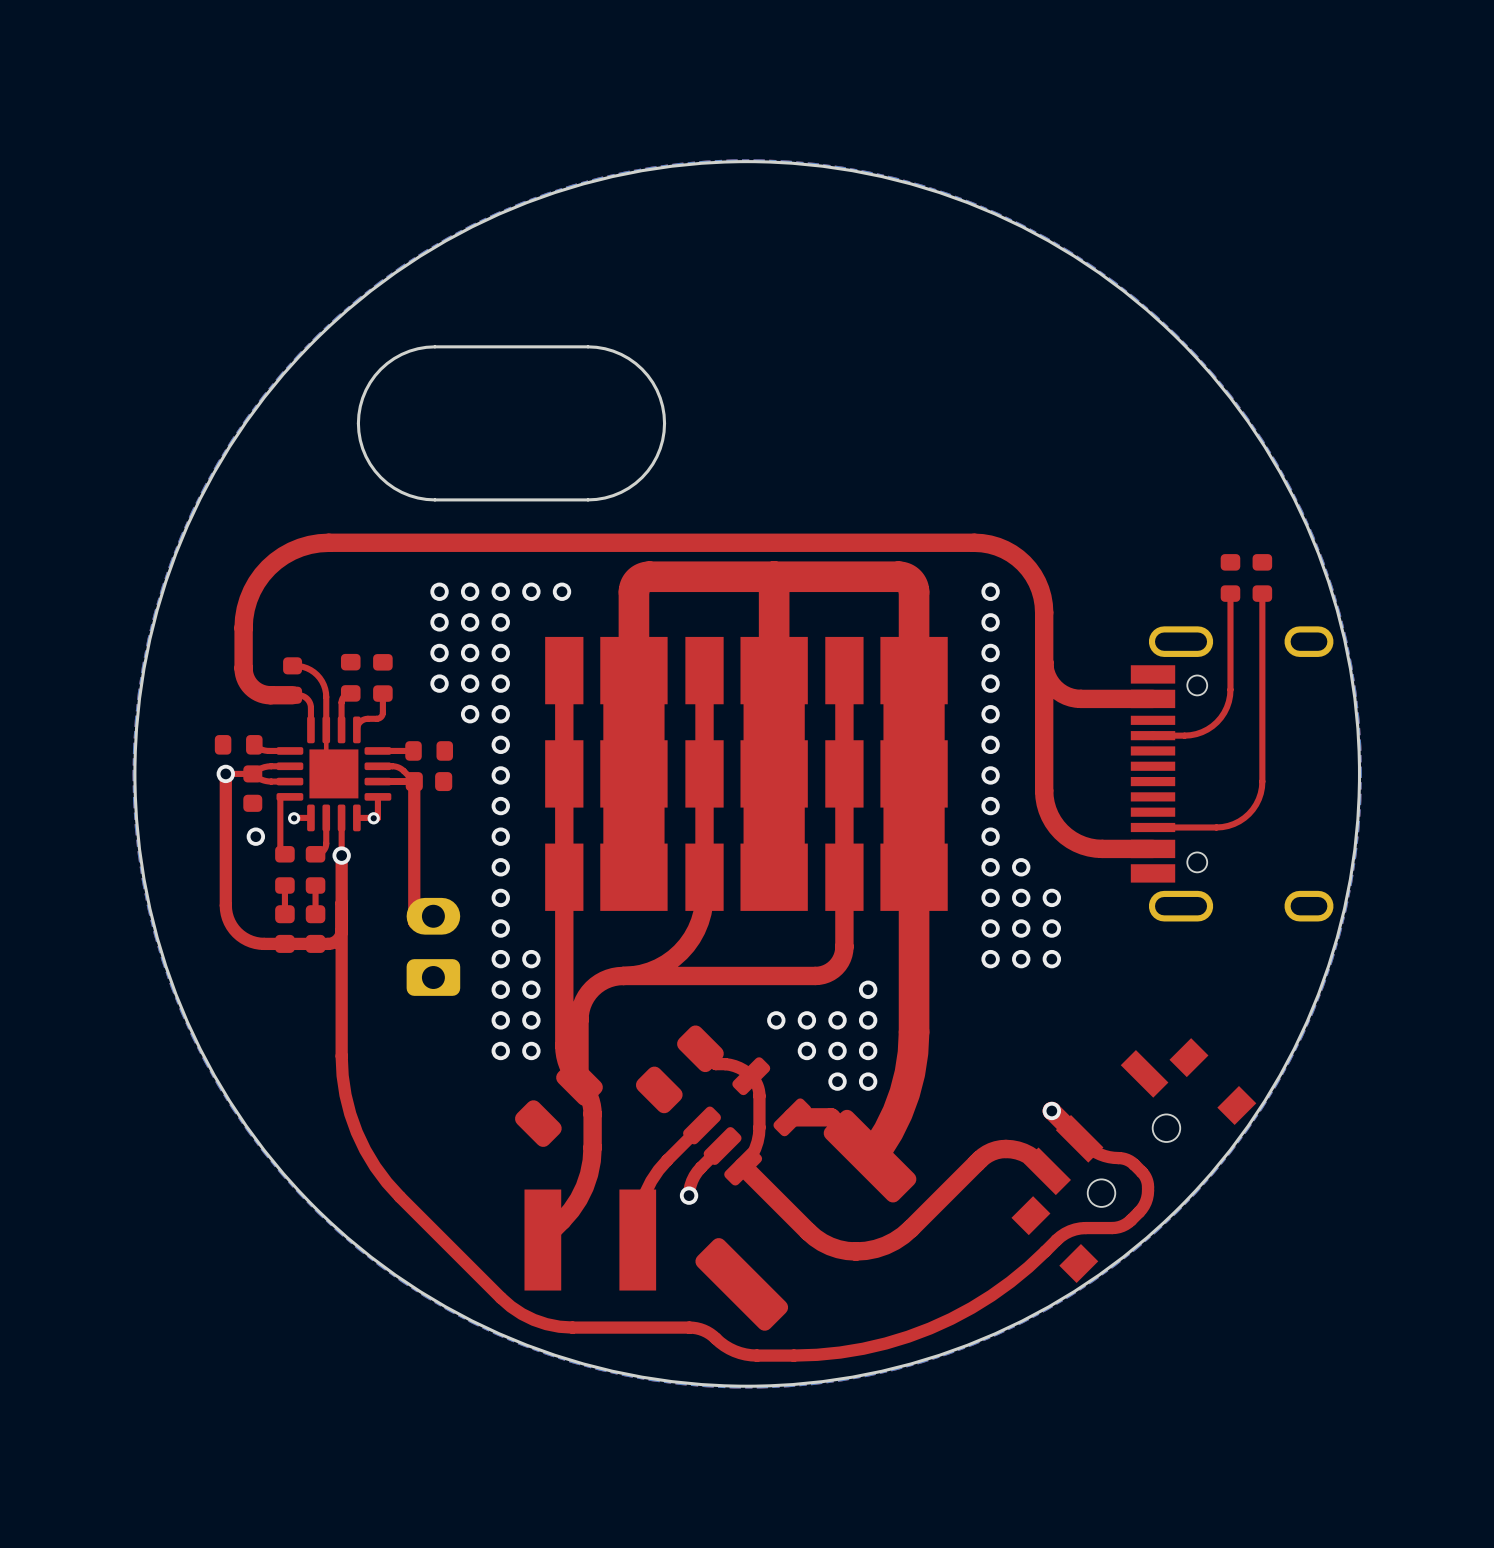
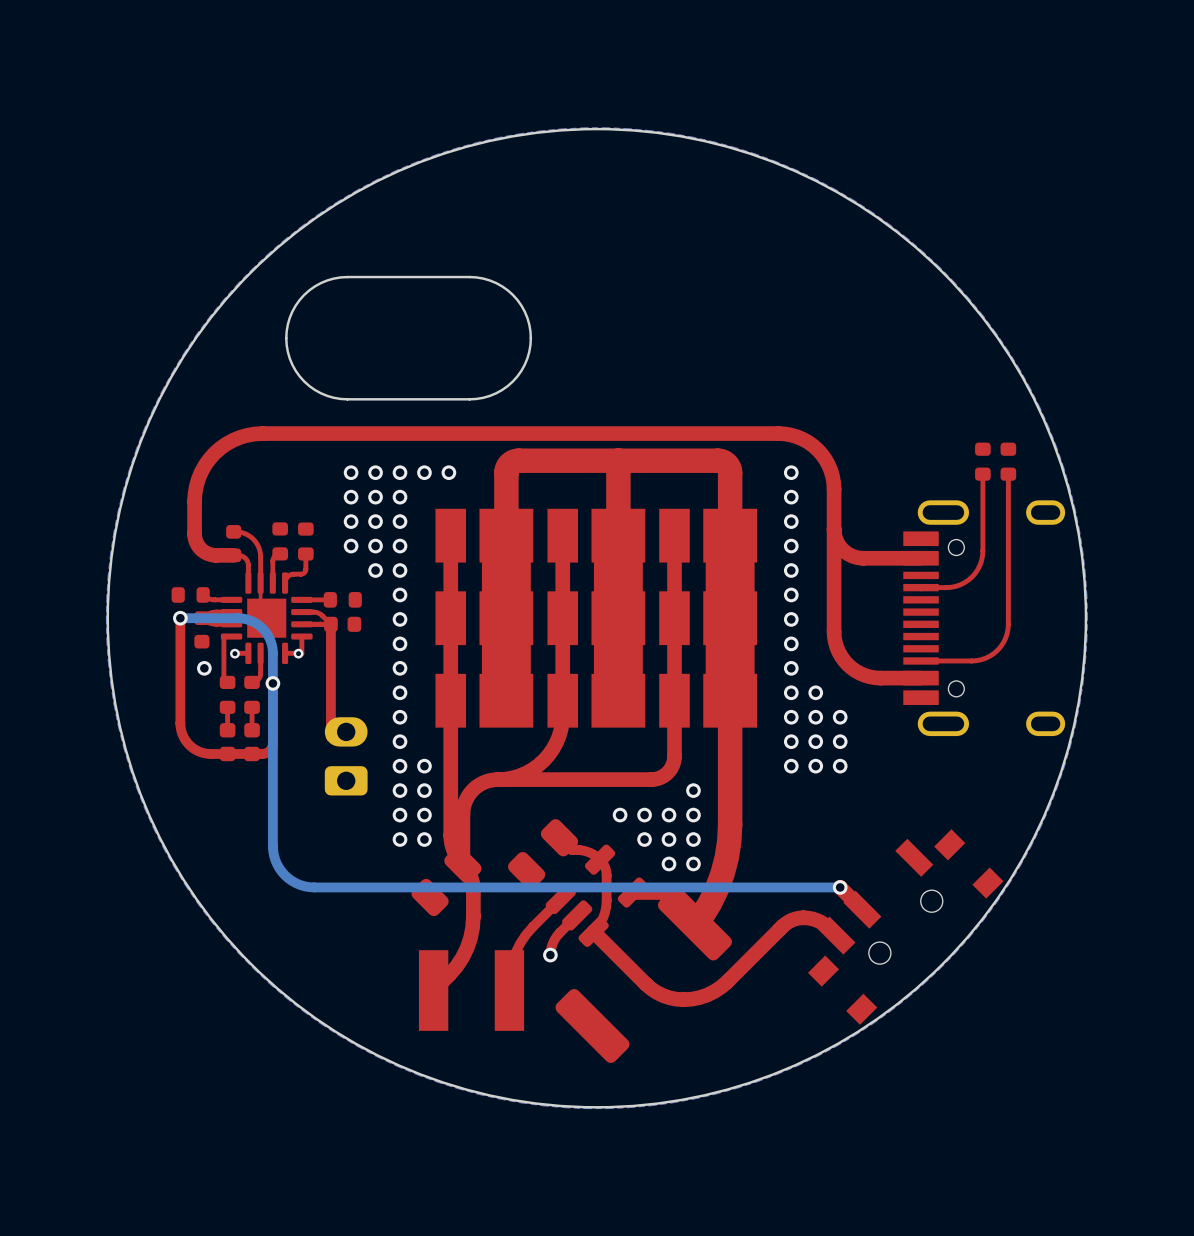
bottom track: none -> (180, 618) (246, 619) (259, 625) (270, 639) (272, 653) (273, 850) (275, 859) (281, 871) (292, 881) (300, 885) (314, 887) (840, 887)
top track: (341, 930) (342, 1075) (350, 1113) (365, 1150) (375, 1166) (399, 1196) (500, 1297) (521, 1314) (546, 1324) (572, 1327) (696, 1328) (710, 1333) (734, 1351) (756, 1355) (840, 1352) (863, 1348) (908, 1336) (951, 1318) (991, 1295) (1028, 1267) (1065, 1233) (1080, 1228) (1119, 1227) (1128, 1222) (1141, 1209) (1145, 1202) (1148, 1190) (1147, 1180) (1143, 1173) (1129, 1161) (1100, 1154) (1079, 1138) -> none

